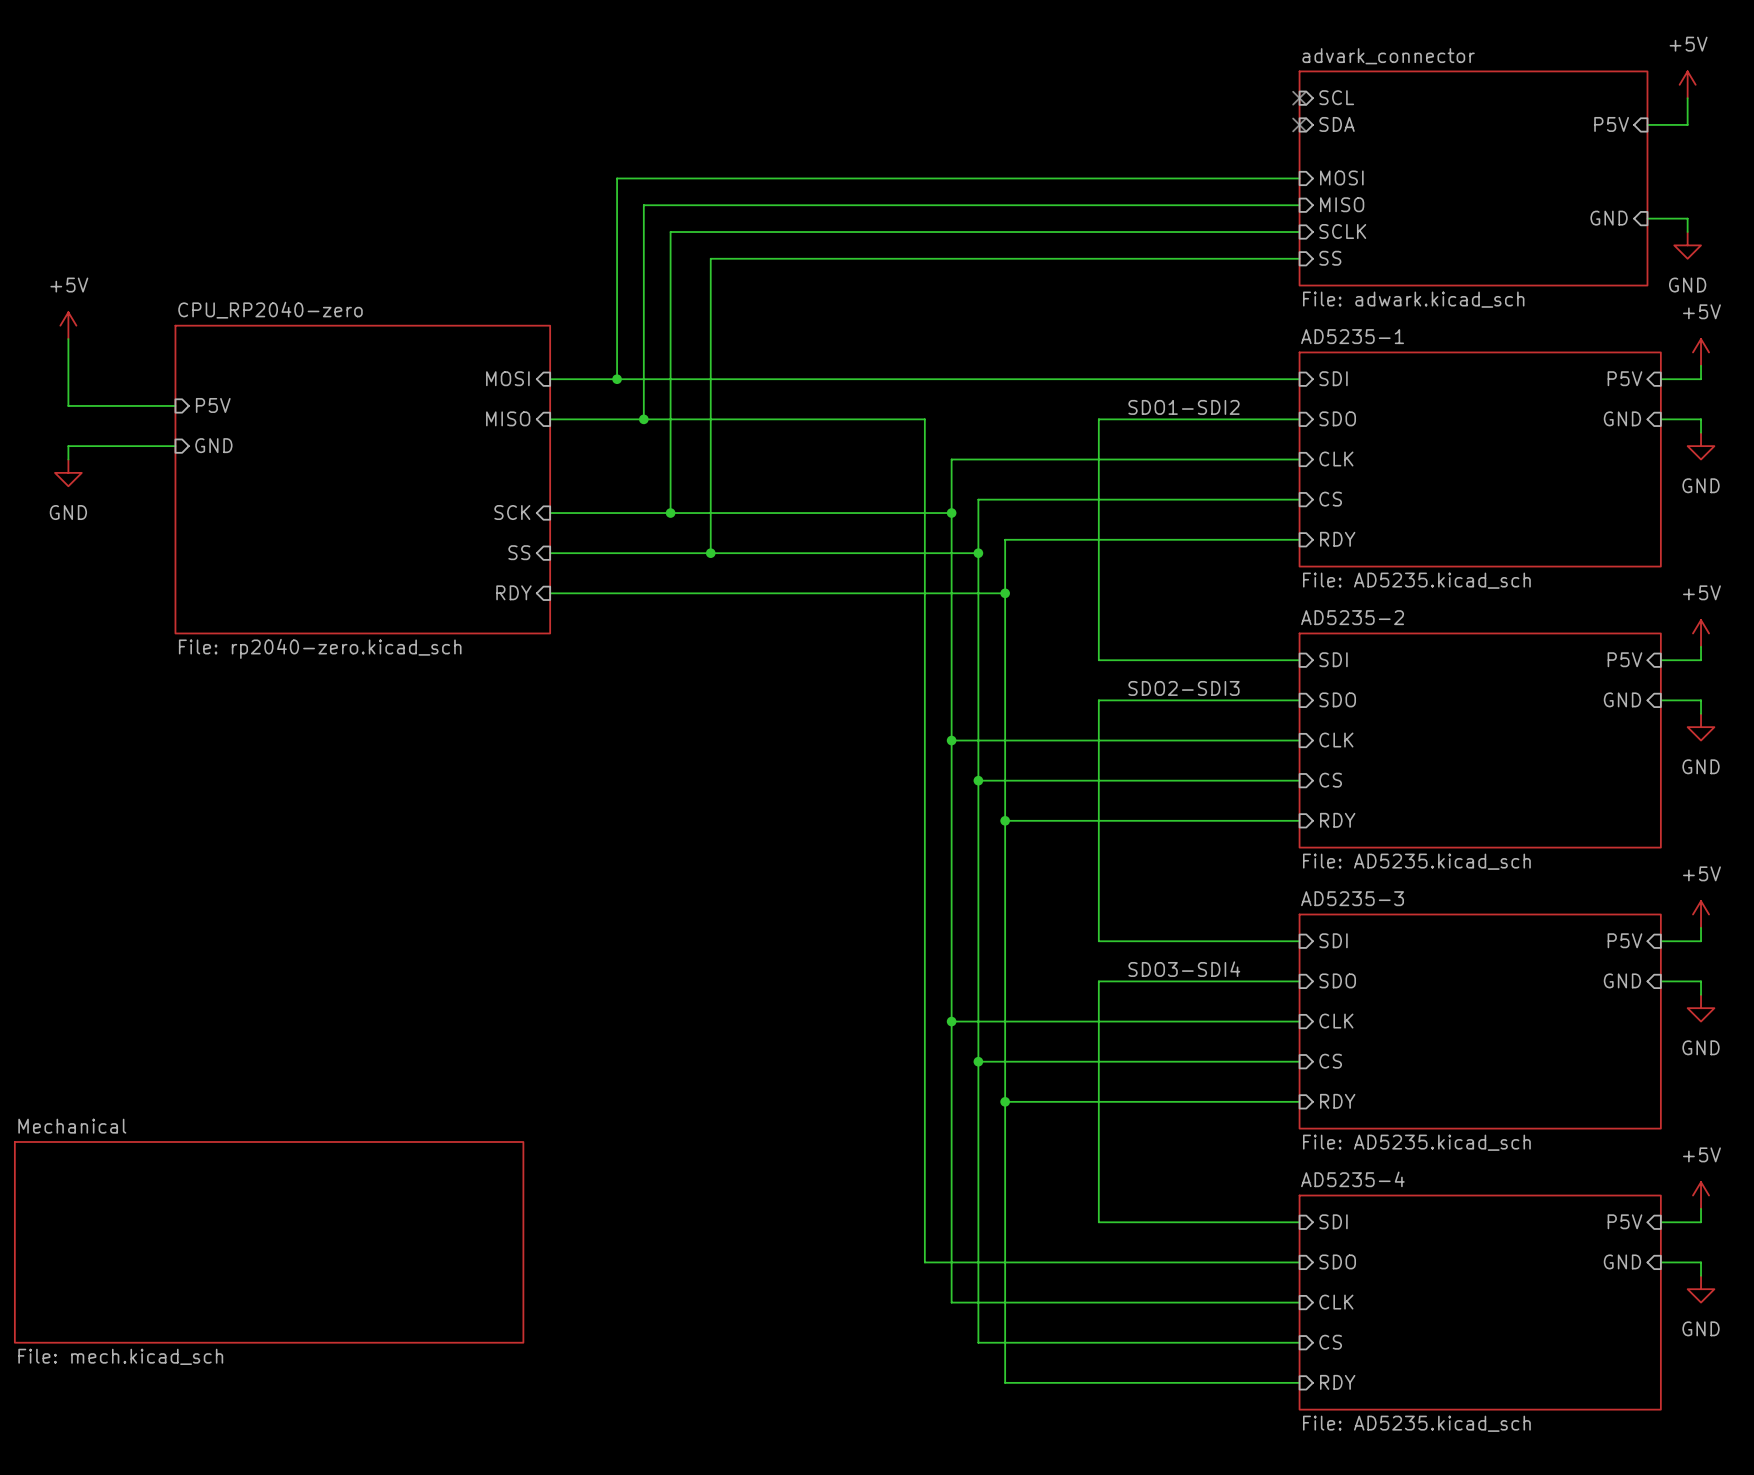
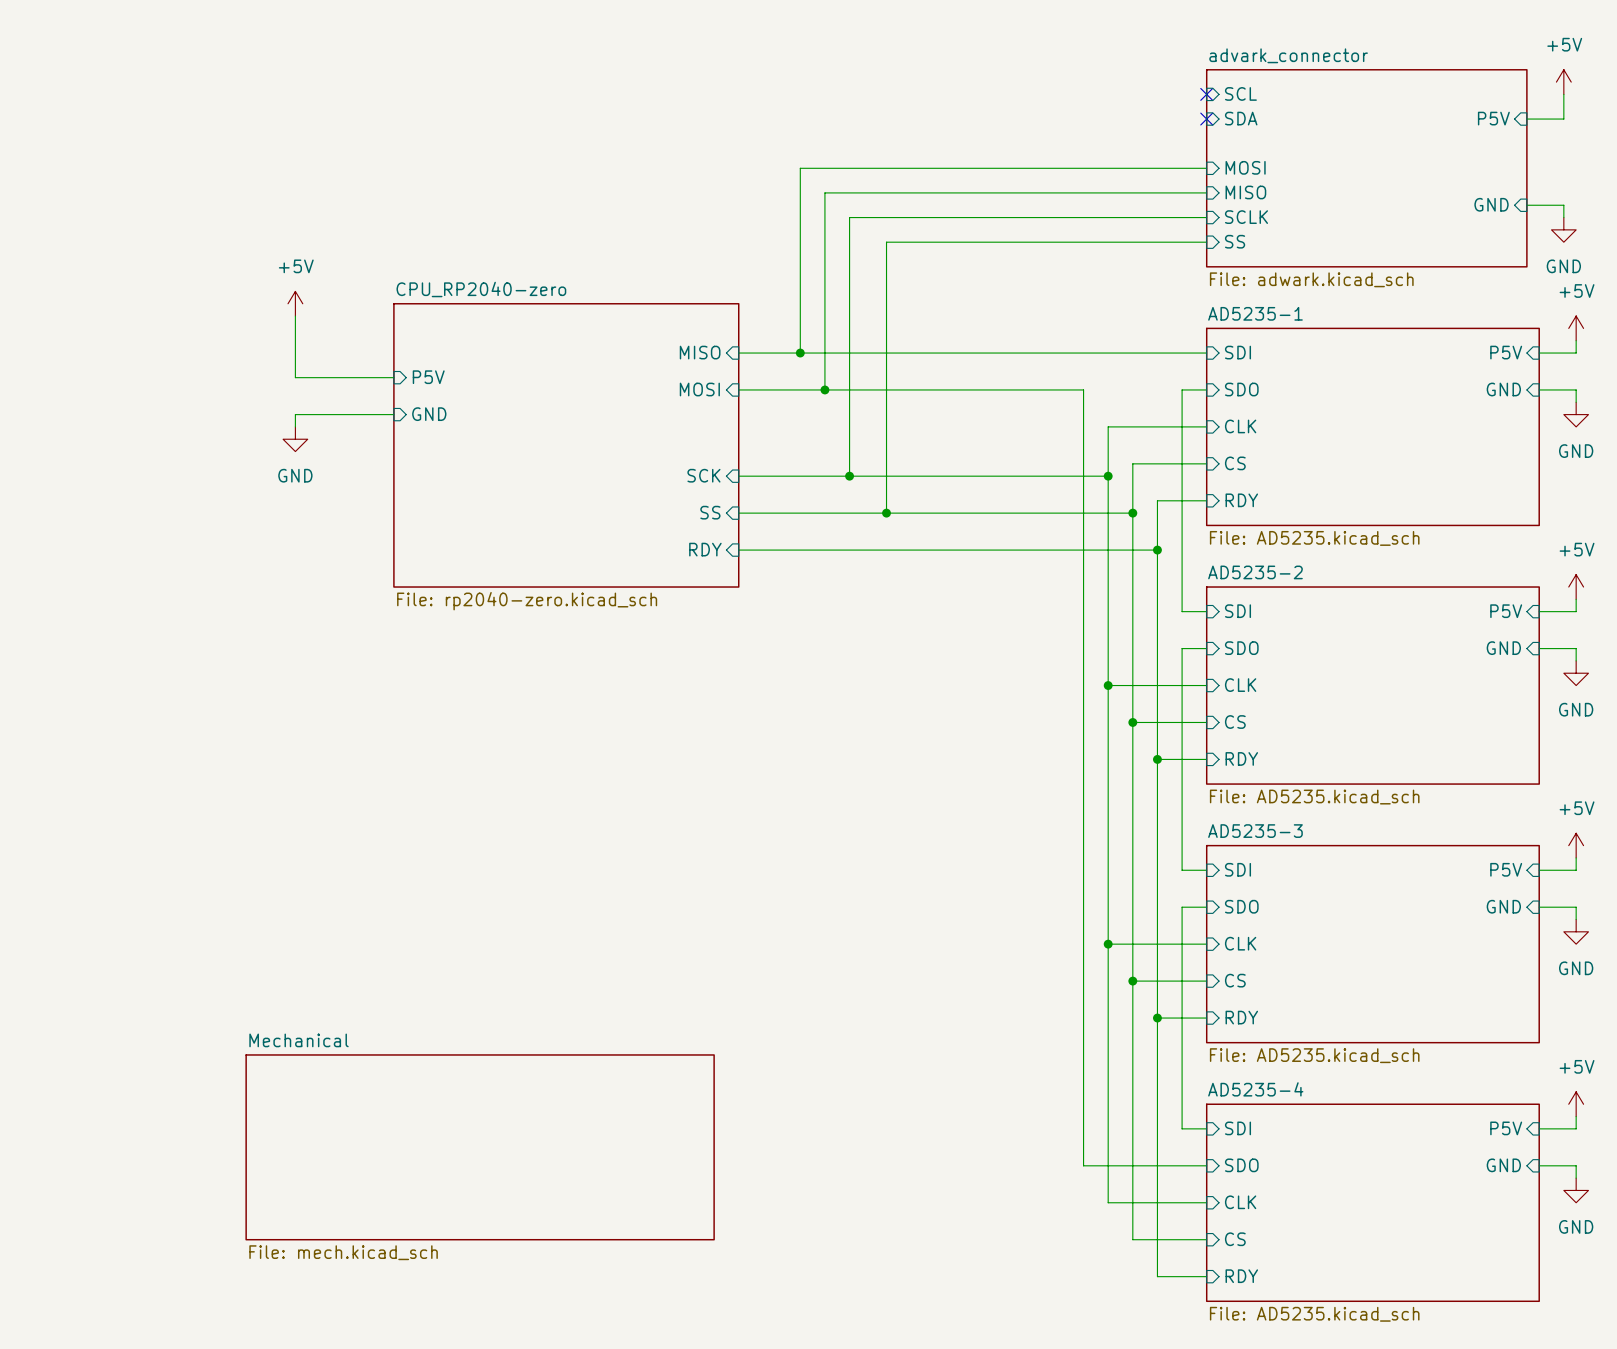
wire: (857, 178) (617, 178) (617, 379) -> (800, 168) (800, 353)
wire: (884, 205) (643, 205) (643, 419) -> (824, 192) (824, 389)
wire: (911, 232) (670, 232) (670, 513) -> (849, 217) (849, 476)
wire: (951, 258) (710, 258) (710, 553) -> (886, 242) (886, 426)
power symbol position: +5V (68, 325) -> +5V (295, 303)
wire: (68, 339) (68, 405) (175, 405) -> (295, 316) (295, 377) (393, 377)
sheet pin position: MOSI (507, 378) -> MOSI (699, 389)
wire: (550, 379) (791, 379) -> none
junction: (617, 379) -> none
junction: none -> (800, 353)
sheet pin position: P5V (213, 405) -> P5V (428, 377)
label: SDO1-SDI2 (1183, 407) -> none
sheet pin position: MISO (508, 418) -> MISO (700, 352)
wire: (550, 419) (791, 419) -> none
junction: (643, 419) -> none
junction: none -> (824, 389)
wire: (924, 419) (924, 1262) (1165, 1262) -> (1083, 389) (1083, 1165)
wire: none -> (861, 389) (1021, 389)
wire: (1098, 419) (1098, 660) (1272, 660) -> (1182, 389) (1182, 611)
wire: (1165, 419) (1272, 419) -> none
sheet pin position: GND (213, 445) -> GND (429, 414)
wire: (175, 446) (68, 446) (68, 459) -> (393, 414) (295, 414) (295, 426)
wire: (951, 459) (1192, 459) -> none
power symbol position: GND (68, 472) -> GND (295, 439)
sheet CPU_RP2040-zero position: (362, 479) -> (566, 445)
wire: (1219, 499) (978, 499) (978, 1342) (1219, 1342) -> (1132, 463) (1132, 1239)
sheet pin position: SCK (512, 512) -> SCK (703, 475)
wire: (550, 513) (791, 513) -> none
junction: (670, 513) -> none
junction: none -> (849, 476)
junction: (951, 513) -> none
junction: none -> (1108, 476)
wire: (1246, 539) (1005, 539) (1005, 1382) (1246, 1382) -> (1157, 500) (1157, 1276)
sheet pin position: SS (519, 552) -> SS (710, 512)
wire: (550, 553) (791, 553) -> none
junction: (710, 553) -> none
wire: (951, 553) (951, 1302) (1192, 1302) -> (1108, 426) (1108, 1202)
junction: none -> (886, 513)
junction: (978, 553) -> none
junction: none -> (1132, 513)
sheet pin position: RDY (513, 592) -> RDY (705, 549)
wire: (550, 593) (791, 593) -> none
junction: (1005, 593) -> none
junction: none -> (1157, 550)
label: SDO2-SDI3 (1183, 688) -> none
wire: (1272, 700) (1098, 700) (1098, 941) (1272, 941) -> (1182, 648) (1182, 870)
wire: (951, 740) (1192, 740) -> (886, 476) (1108, 476)
junction: (951, 740) -> none
junction: none -> (1108, 685)
wire: (978, 780) (1219, 780) -> (911, 513) (1132, 513)
junction: (978, 780) -> none
junction: none -> (1132, 722)
wire: (1005, 820) (1246, 820) -> (935, 550) (1157, 550)
junction: (1005, 820) -> none
junction: none -> (1157, 759)
label: SDO3-SDI4 (1184, 969) -> none
wire: (1272, 981) (1098, 981) (1098, 1222) (1272, 1222) -> (1182, 907) (1182, 1128)
wire: (951, 1021) (1192, 1021) -> none
junction: (951, 1021) -> none
junction: none -> (1108, 944)
wire: (978, 1061) (1219, 1061) -> none
junction: (978, 1061) -> none
junction: none -> (1132, 981)
wire: (1005, 1101) (1246, 1101) -> none
junction: (1005, 1101) -> none
junction: none -> (1157, 1018)
sheet Mechanical position: (269, 1242) -> (480, 1147)

